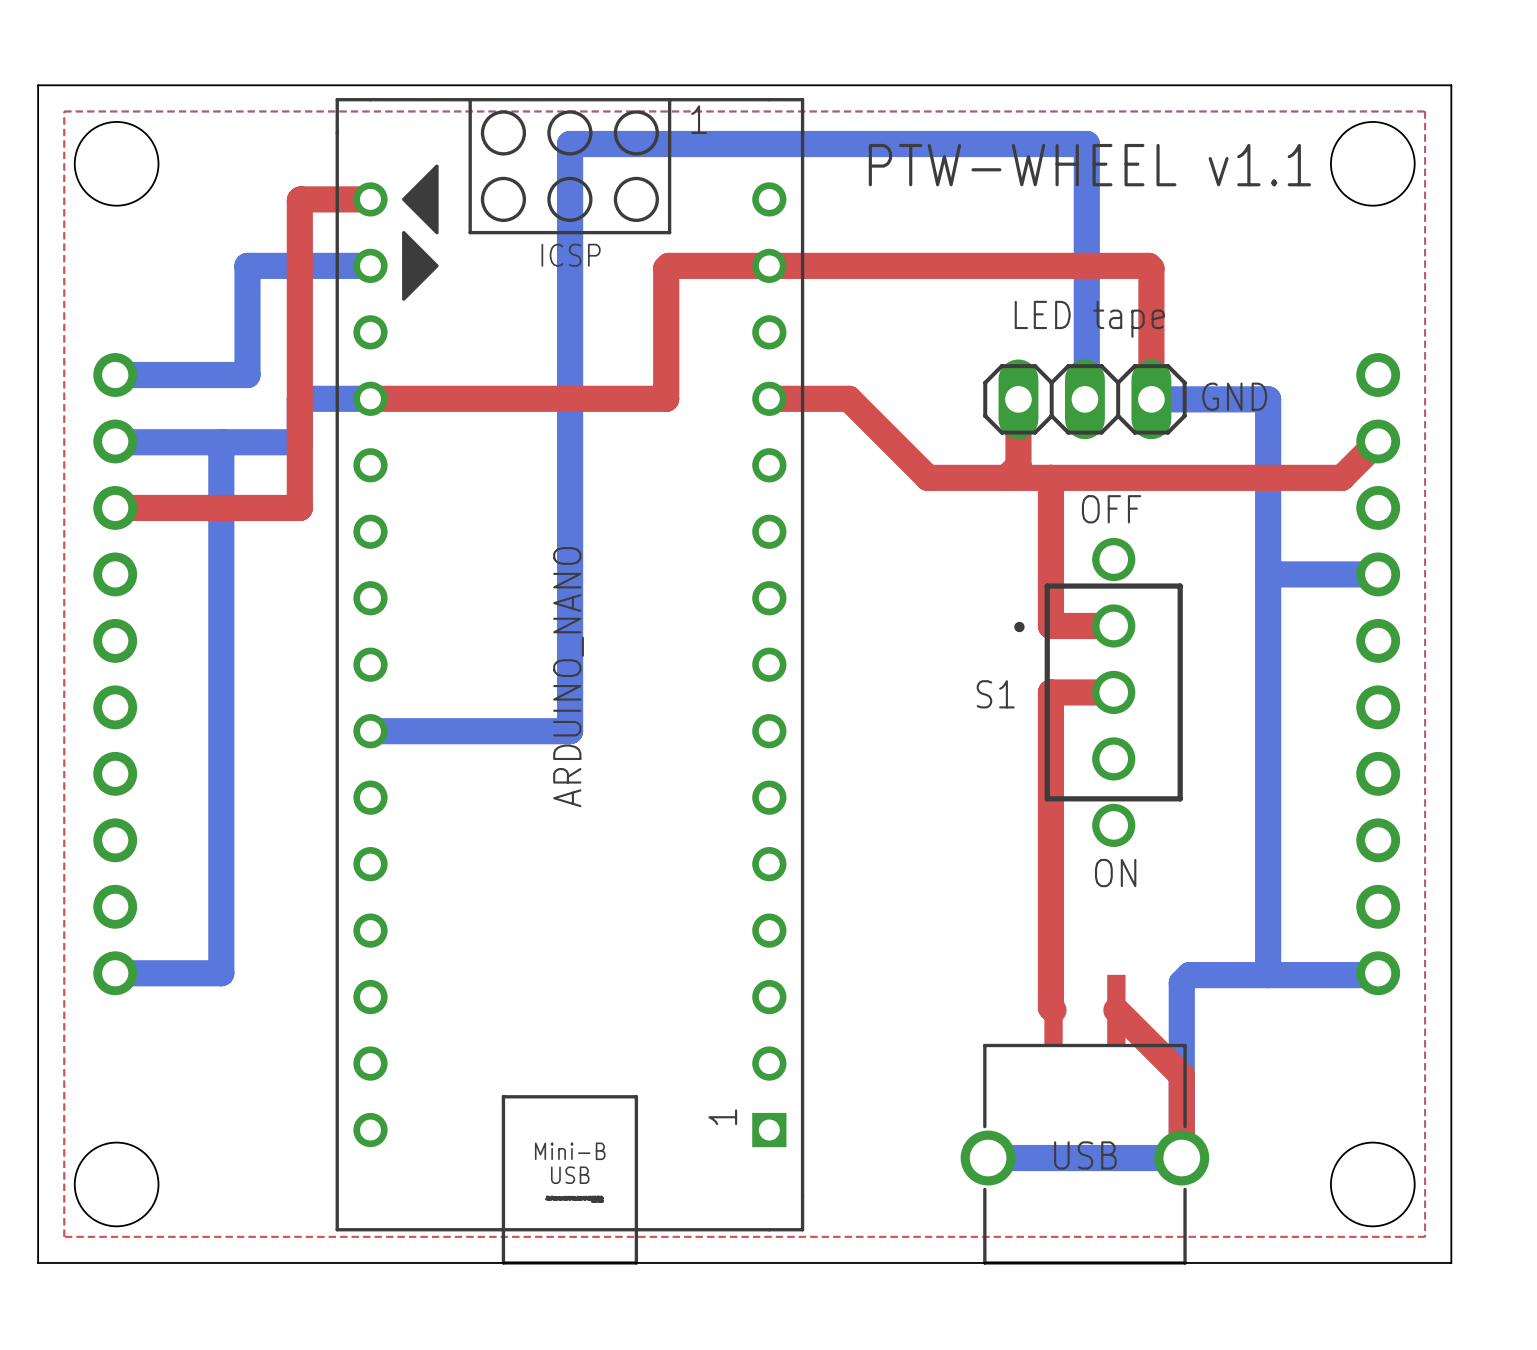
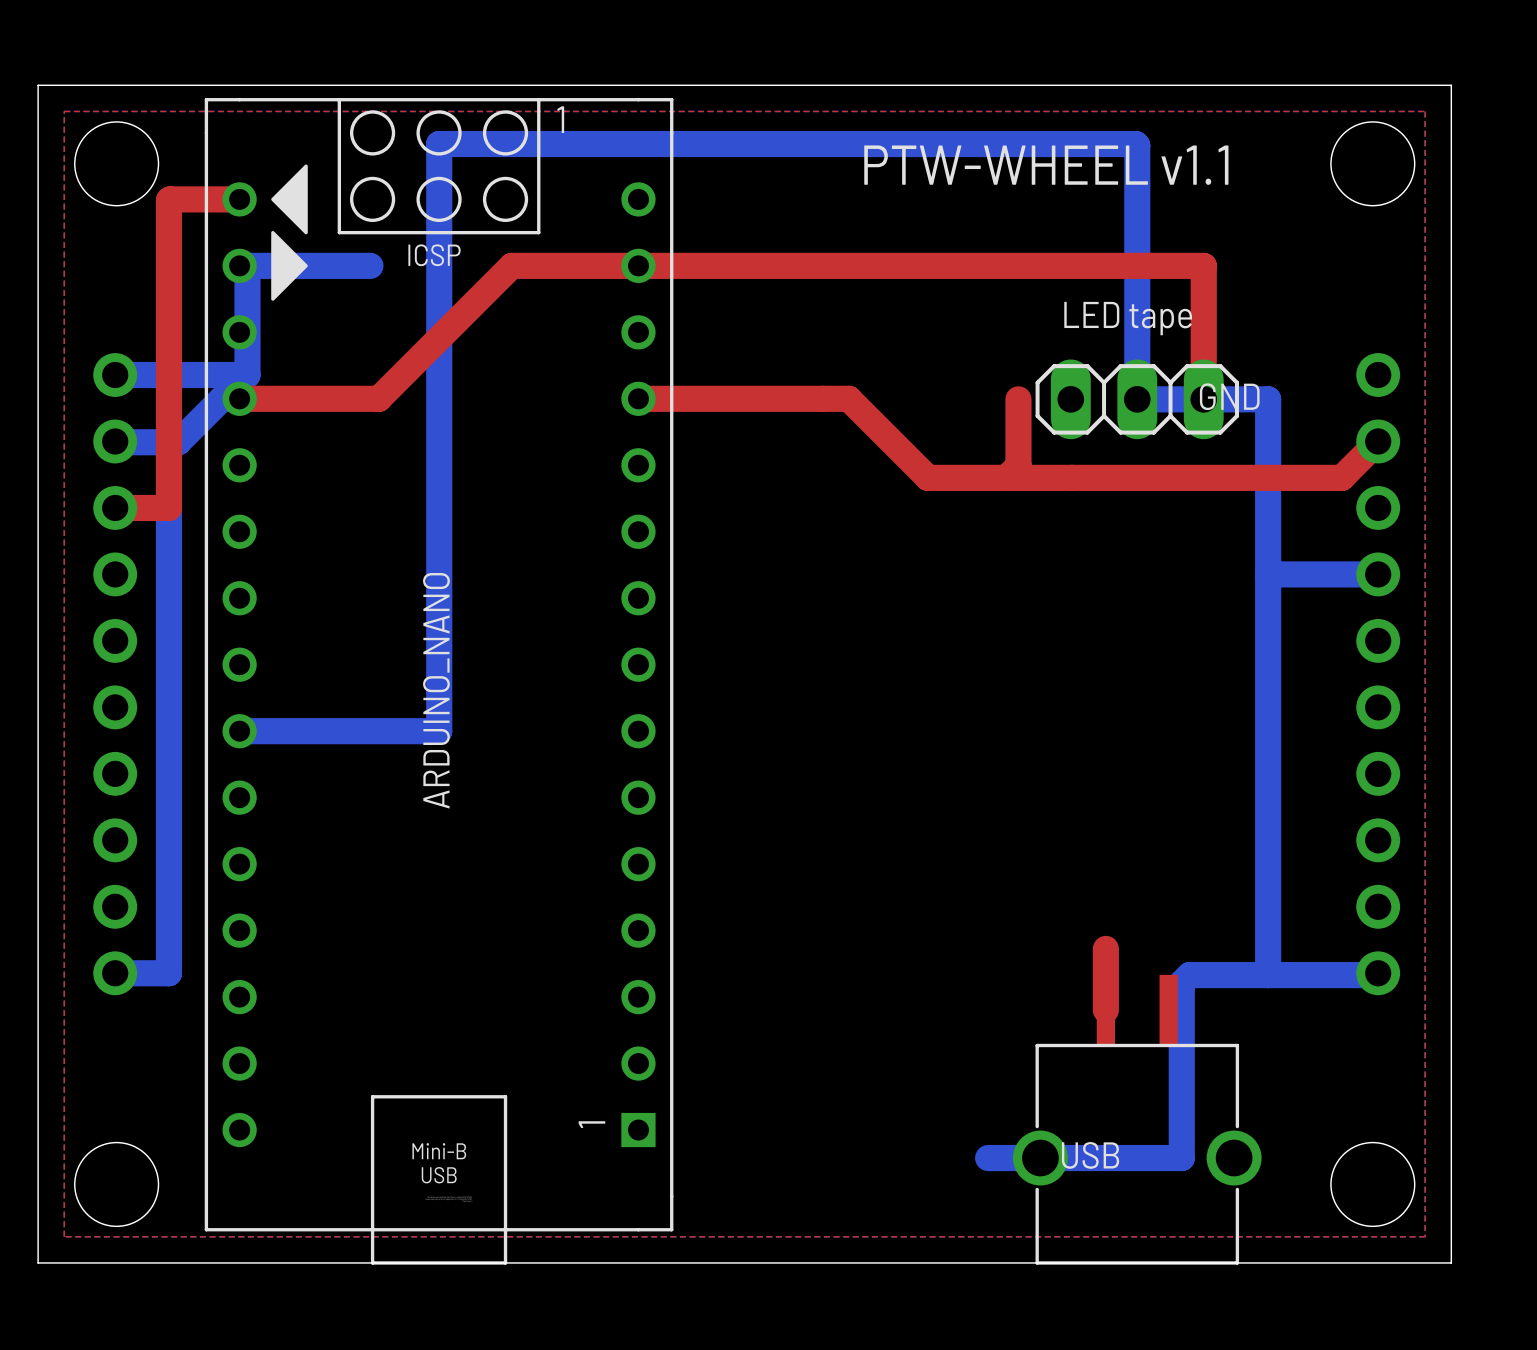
bottom track: (570, 144) (570, 731) (439, 731) -> (570, 144) (439, 144) (439, 731)
bottom track: (1086, 144) (1086, 397) (1084, 399) -> (1086, 144) (1137, 145) (1137, 399)
top track: (370, 199) (299, 200) (299, 507) (168, 507) -> (239, 199) (168, 200) (168, 507)
top track: (668, 265) (666, 268) (666, 398) -> (769, 398) (666, 398)
top track: (1148, 265) (1151, 268) (1151, 399) -> (1148, 265) (1203, 265) (1203, 399)
top track: none -> (239, 398) (370, 398)
bottom track: (370, 398) (300, 398) (299, 442) (178, 442) -> (239, 398) (221, 398) (178, 442)
top track: (378, 398) (638, 398) -> (378, 398) (511, 265) (668, 265)
part position: (1084, 399) -> (1137, 399)
bottom track: (221, 442) (221, 973) (168, 973) -> (168, 442) (168, 973)
top track: (1050, 477) (1050, 625) (1113, 625) -> none
text: OFF (1111, 509) -> none
ARDUINO_NANO position: (569, 681) -> (439, 681)
S1: (1098, 692) -> none
top track: (1113, 692) (1050, 692) (1050, 1007) (1053, 1010) -> none
bottom track: none -> (239, 731) (370, 731)
text: ON (1115, 873) -> none
top track: none -> (1105, 948) (1105, 1010)
top track: (1116, 1010) (1181, 1075) (1181, 1158) -> none
USB position: (1084, 1119) -> (1137, 1119)

